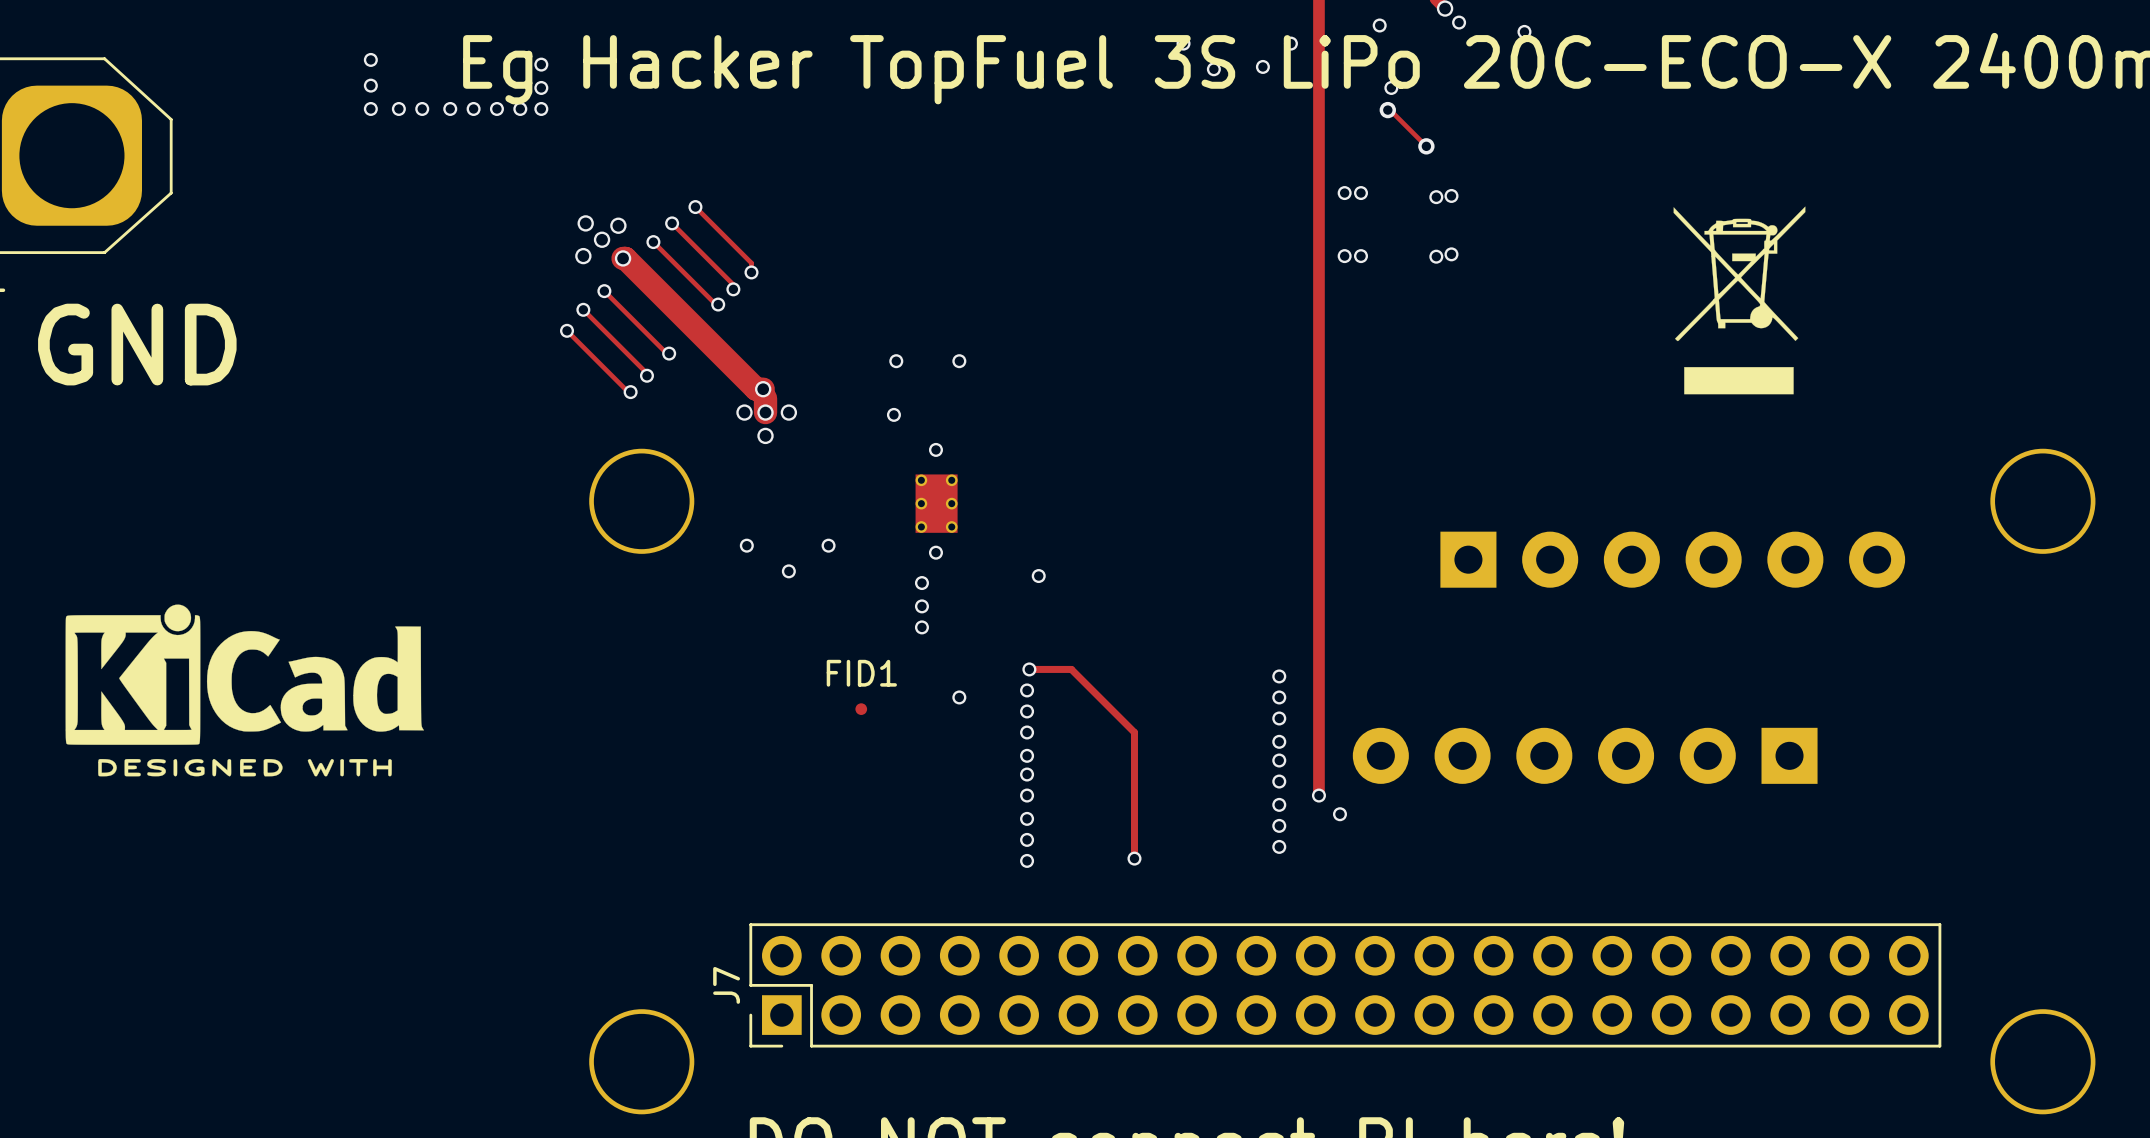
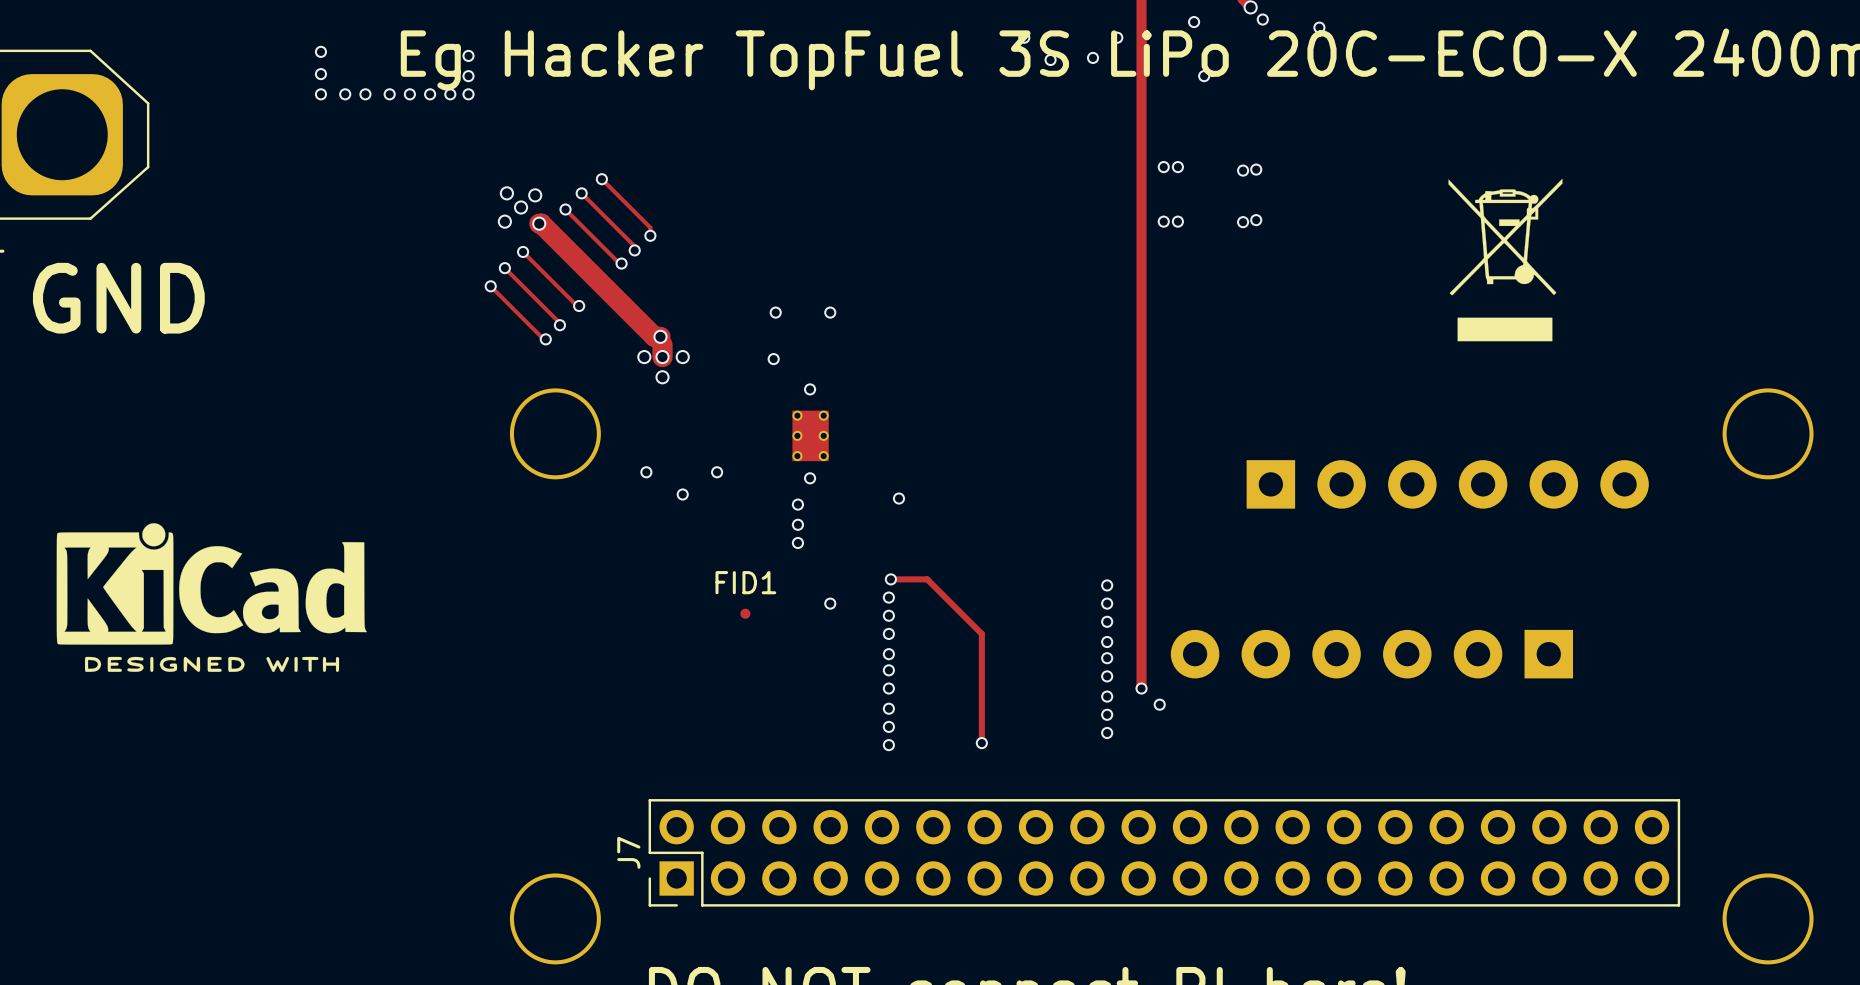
track: (1387, 110) (1390, 110) (1426, 146) -> none
via: (1387, 110) -> none
via: (1426, 146) -> none

